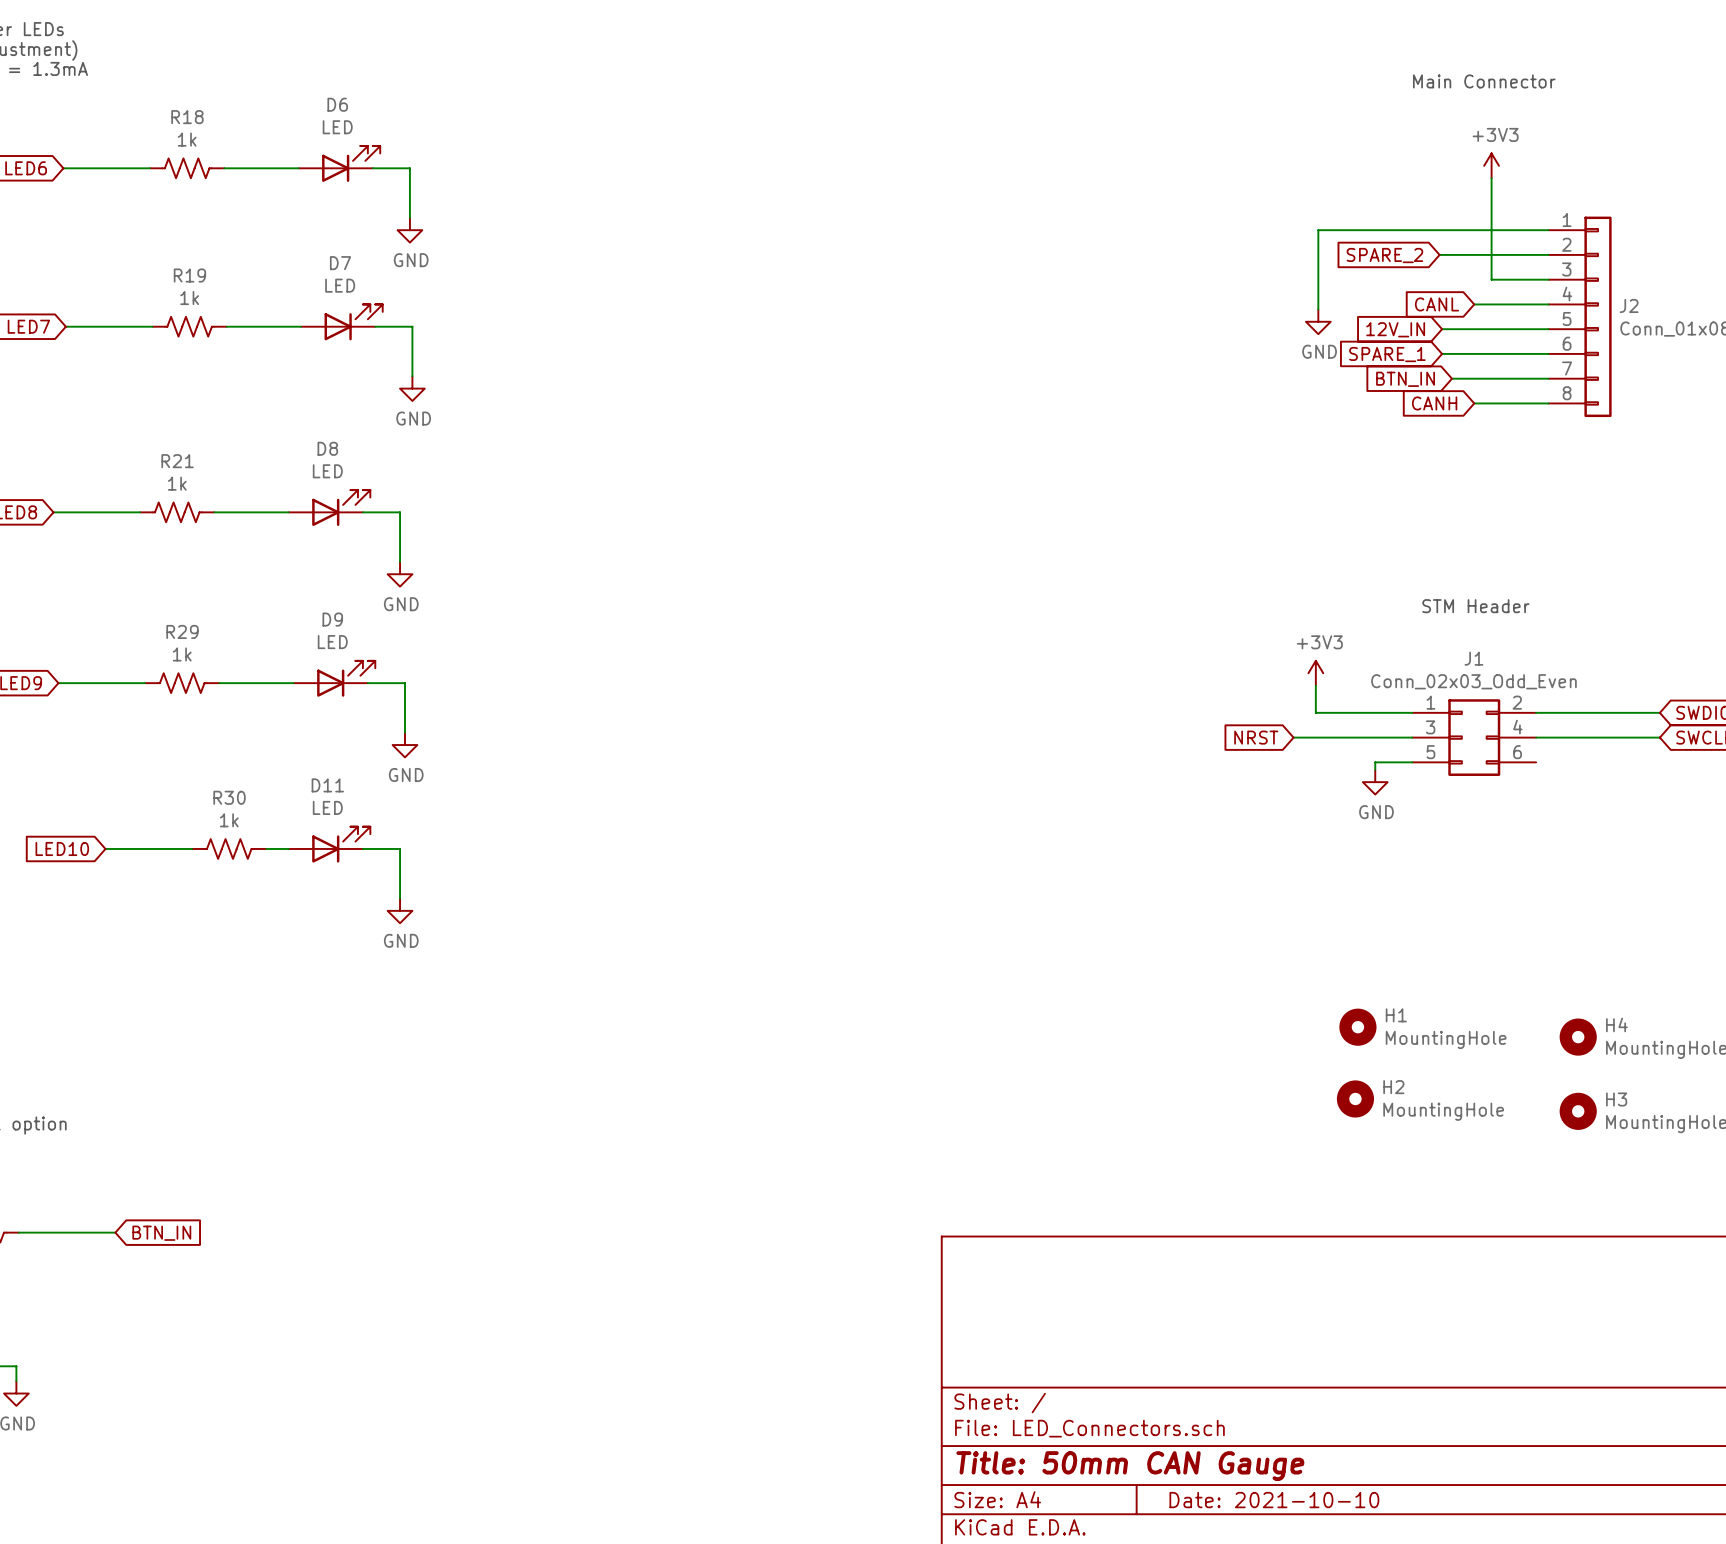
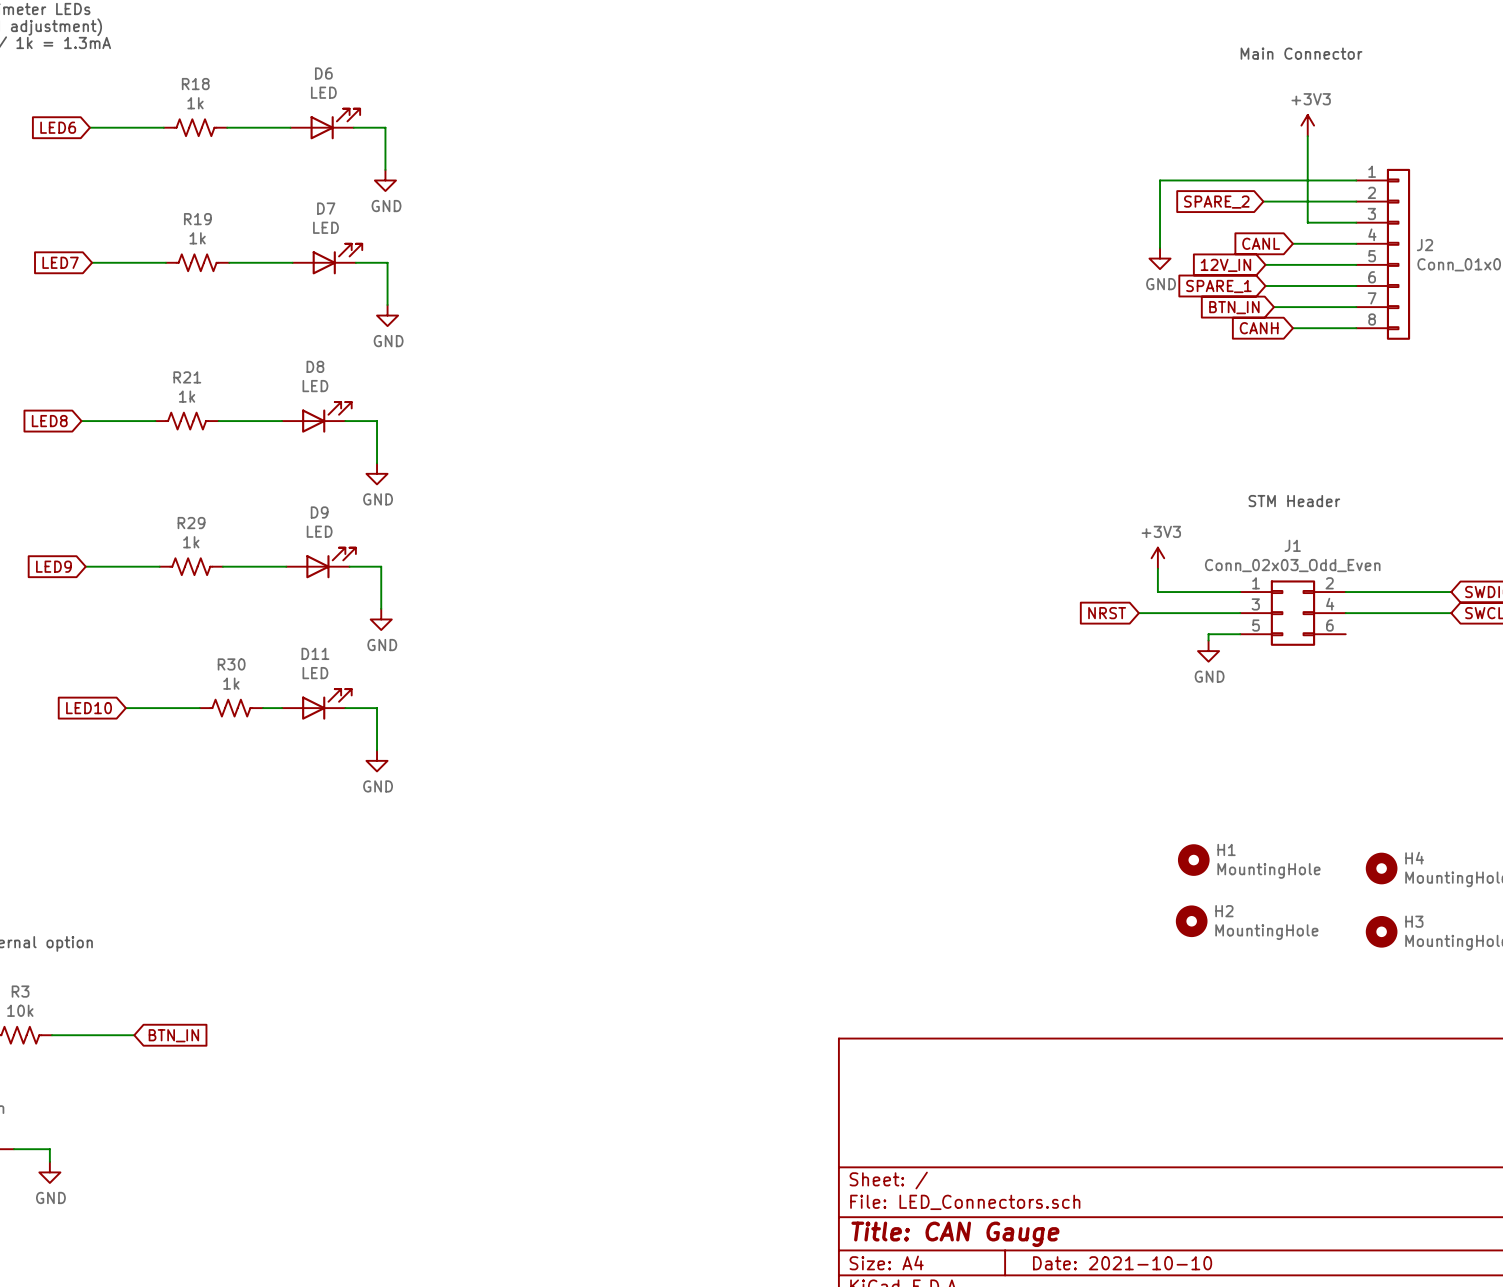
title block: Title: 50mm CAN Gauge (1130, 1466) -> Title: CAN Gauge (955, 1234)

